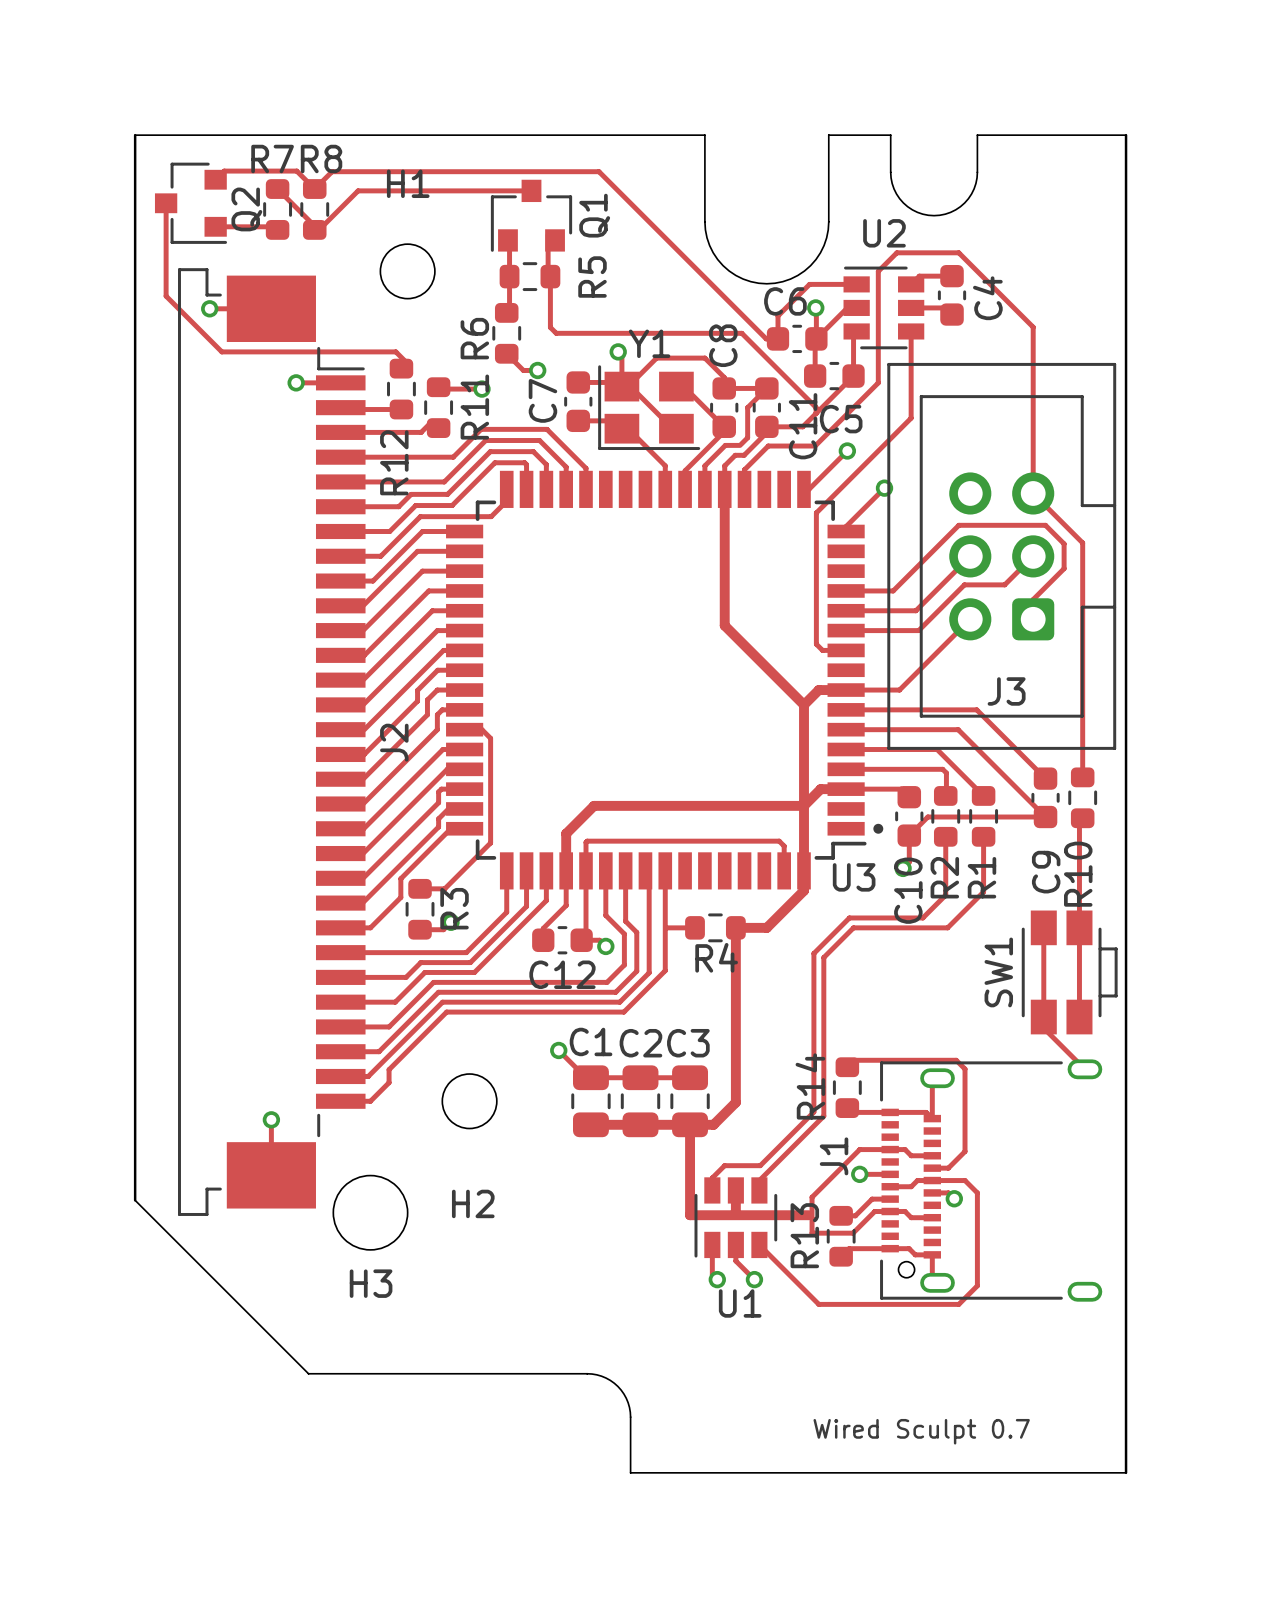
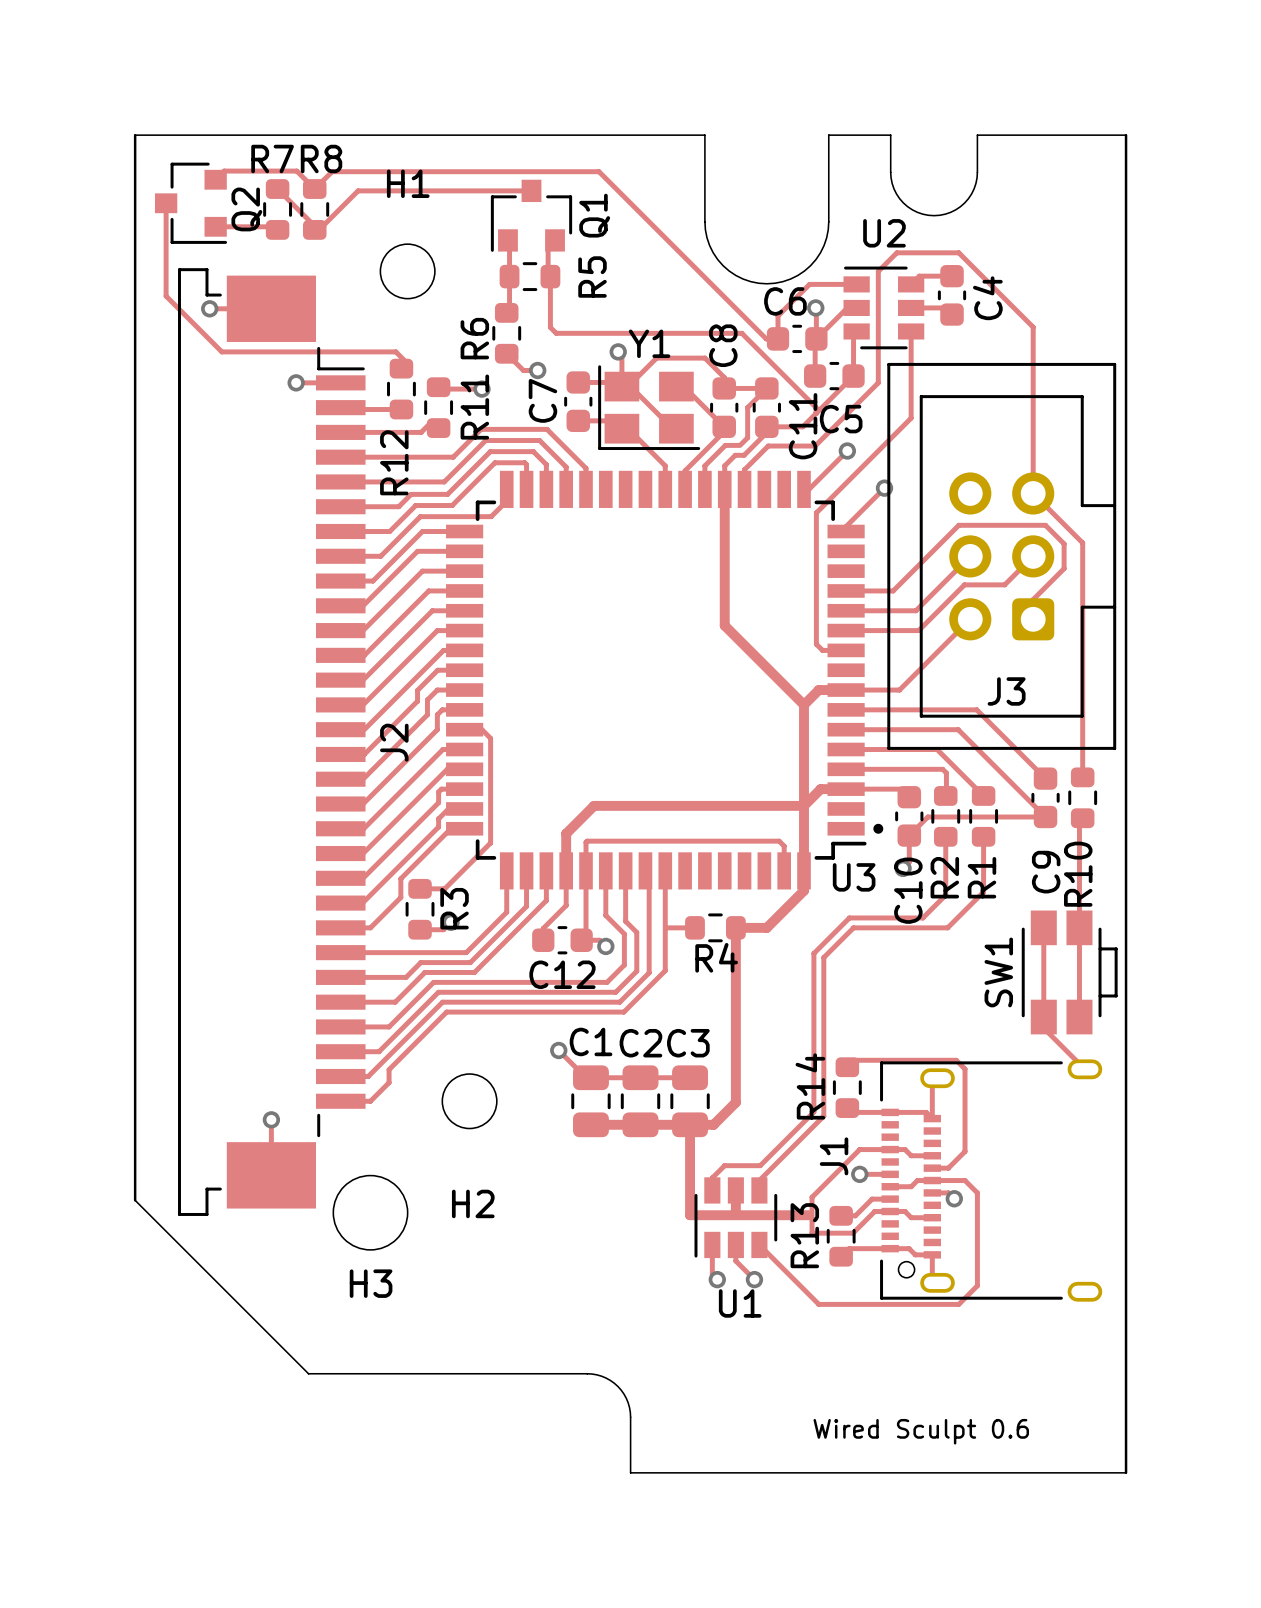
text: Wired Sculpt 0.7 (921, 1431) -> Wired Sculpt 0.6 (921, 1431)

